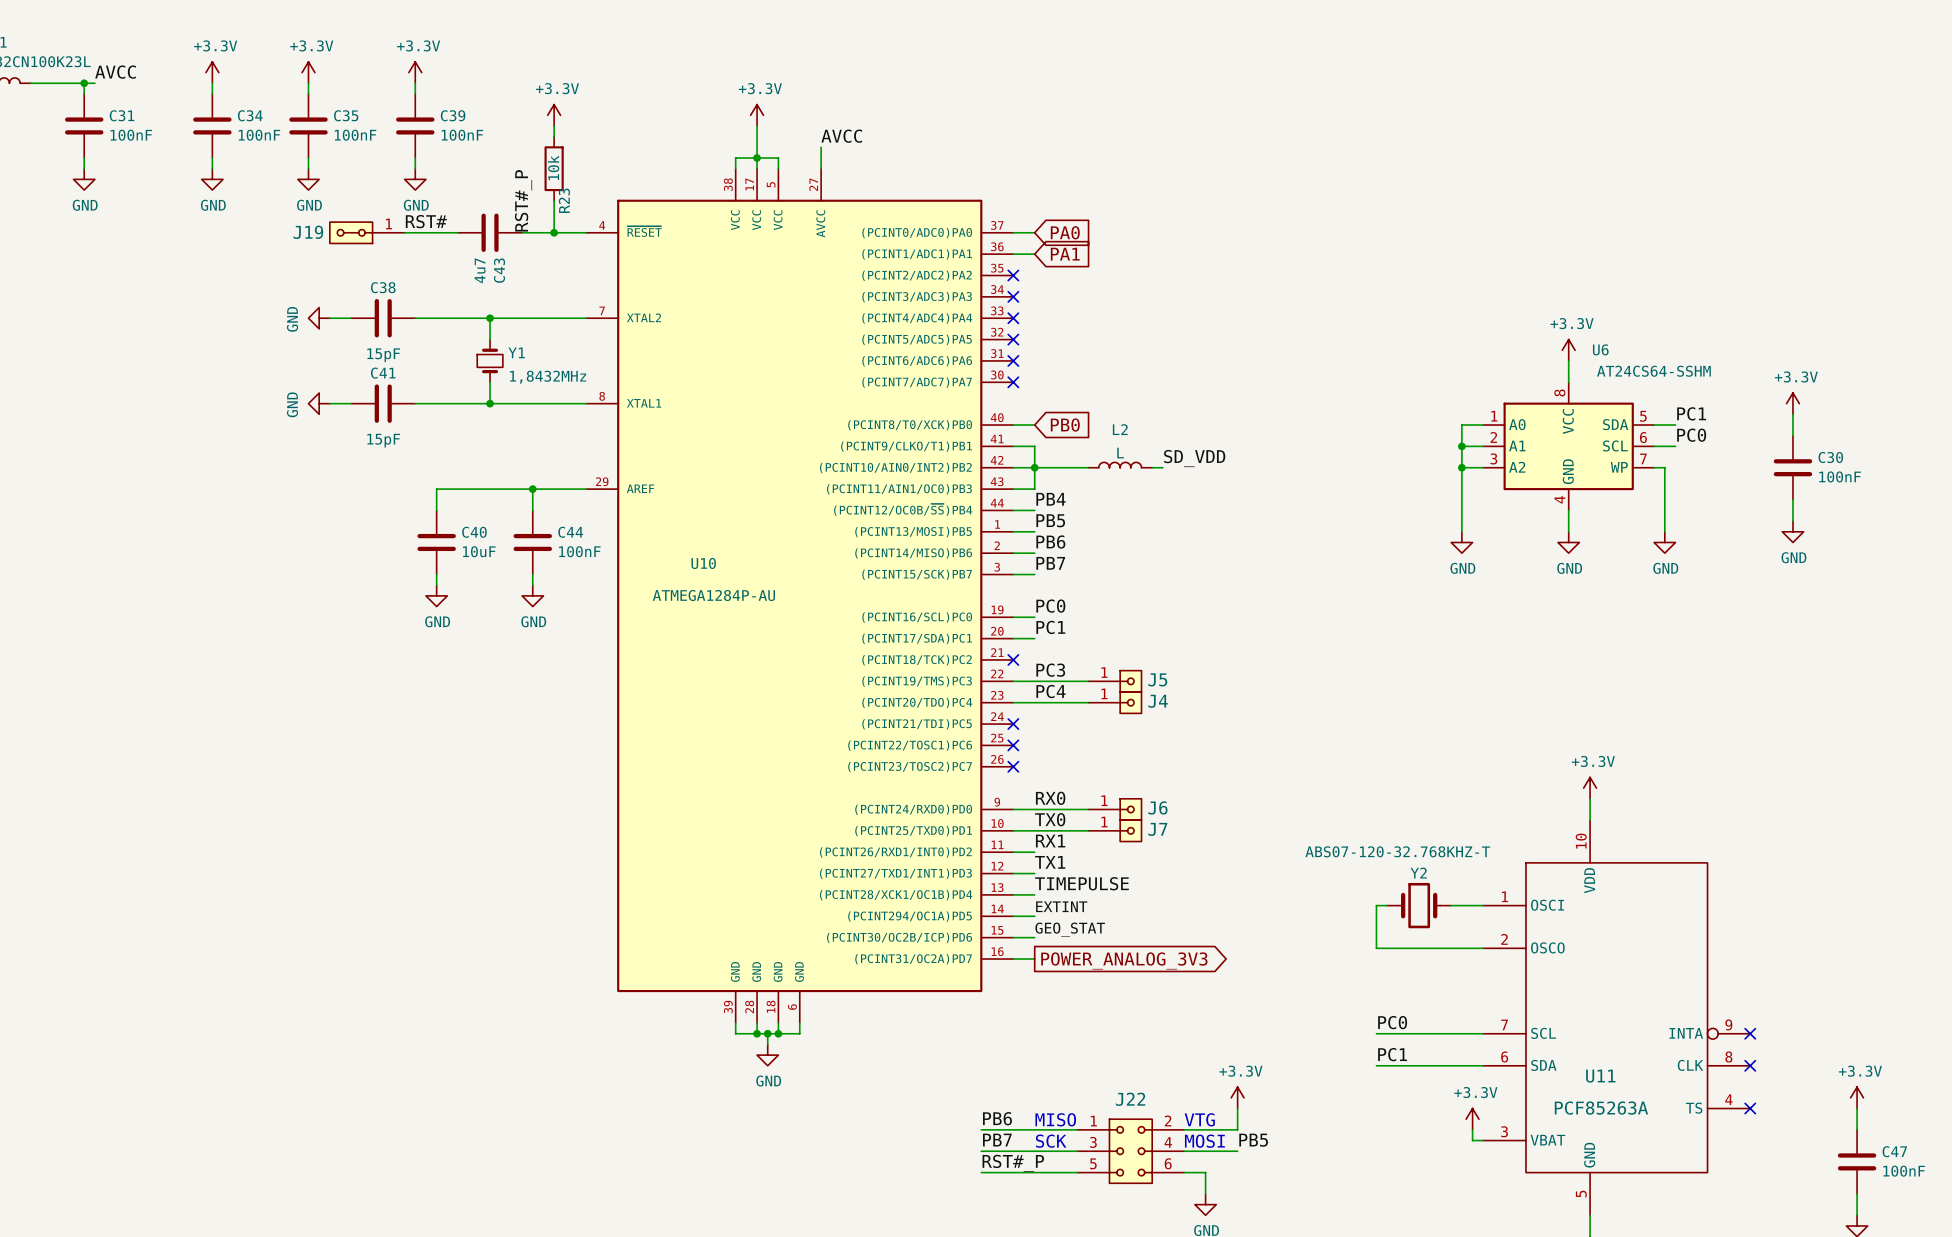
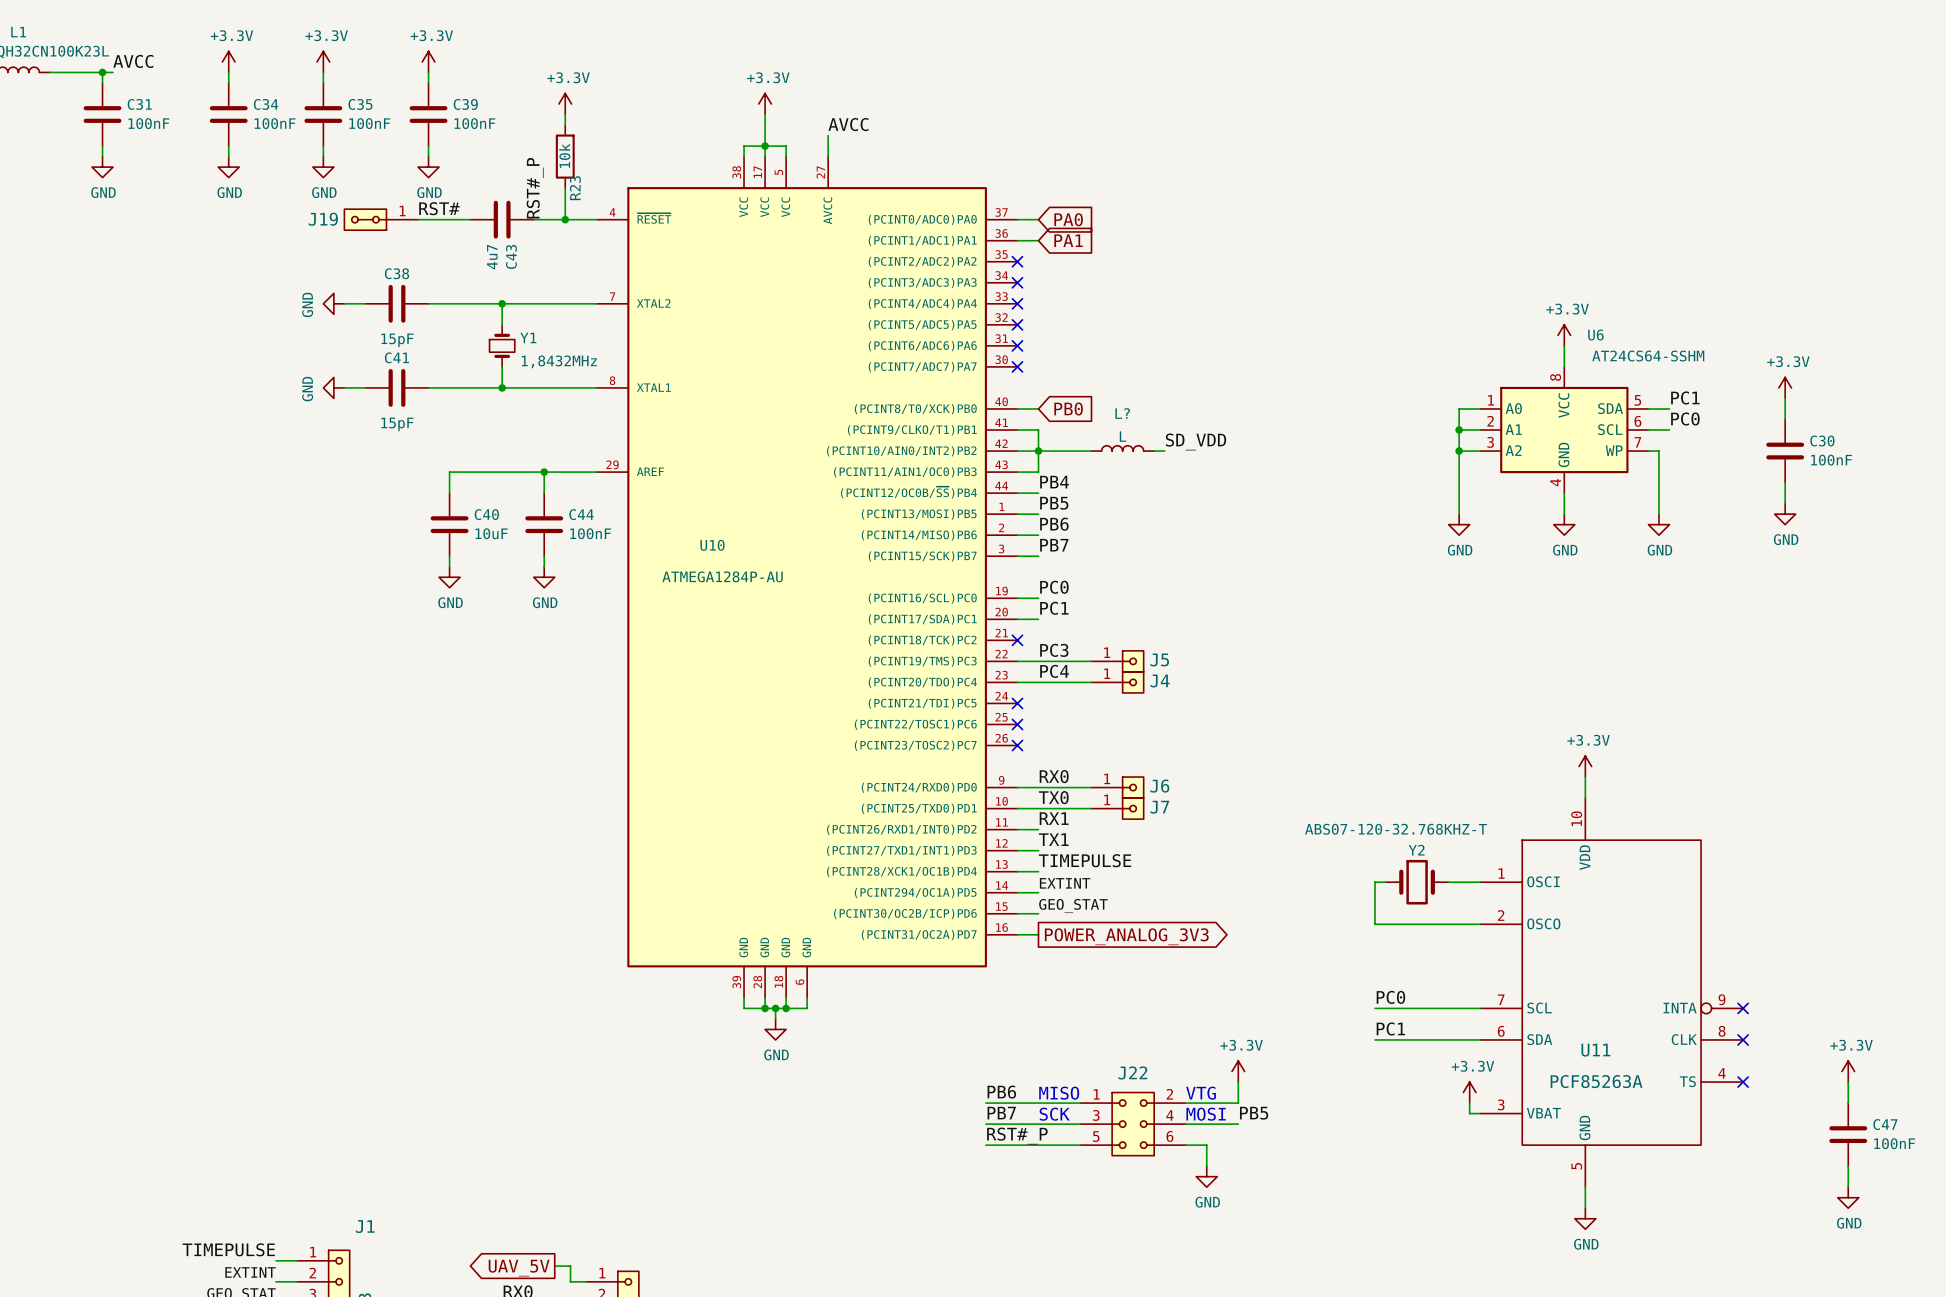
L2 name: L2 (1120, 429) -> L? (1122, 413)

